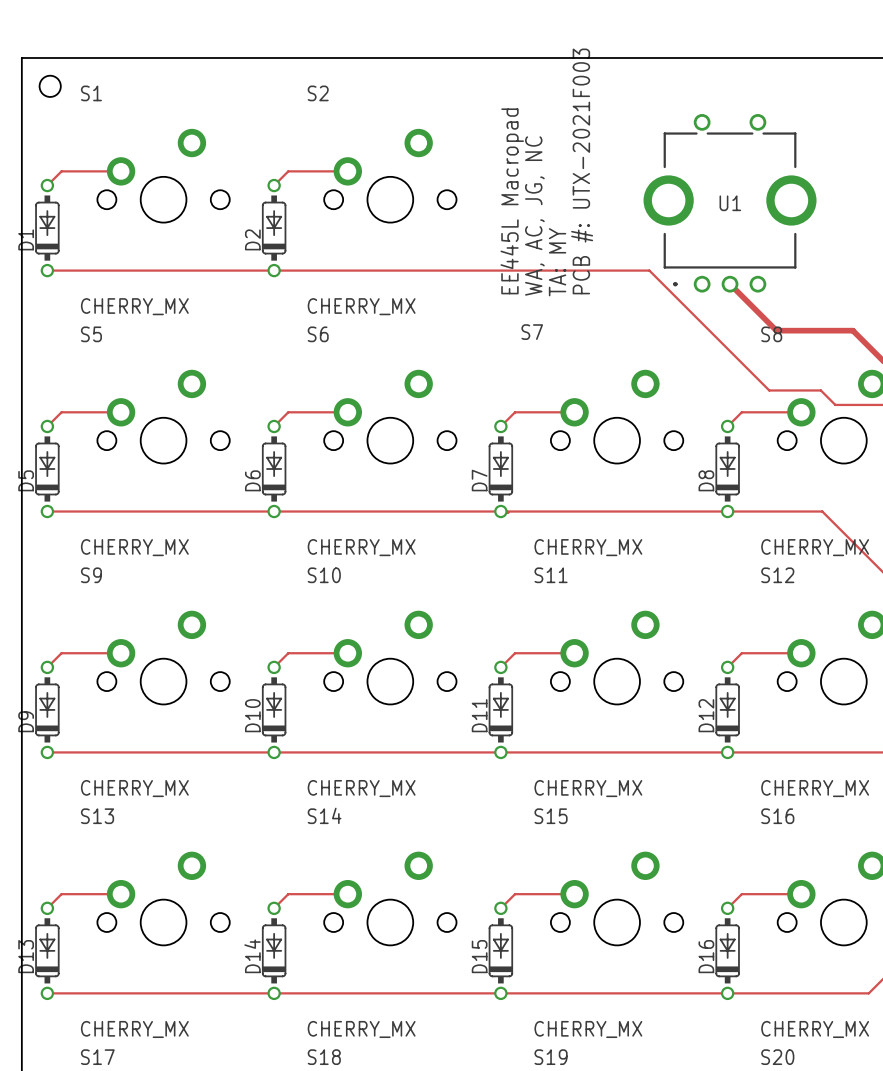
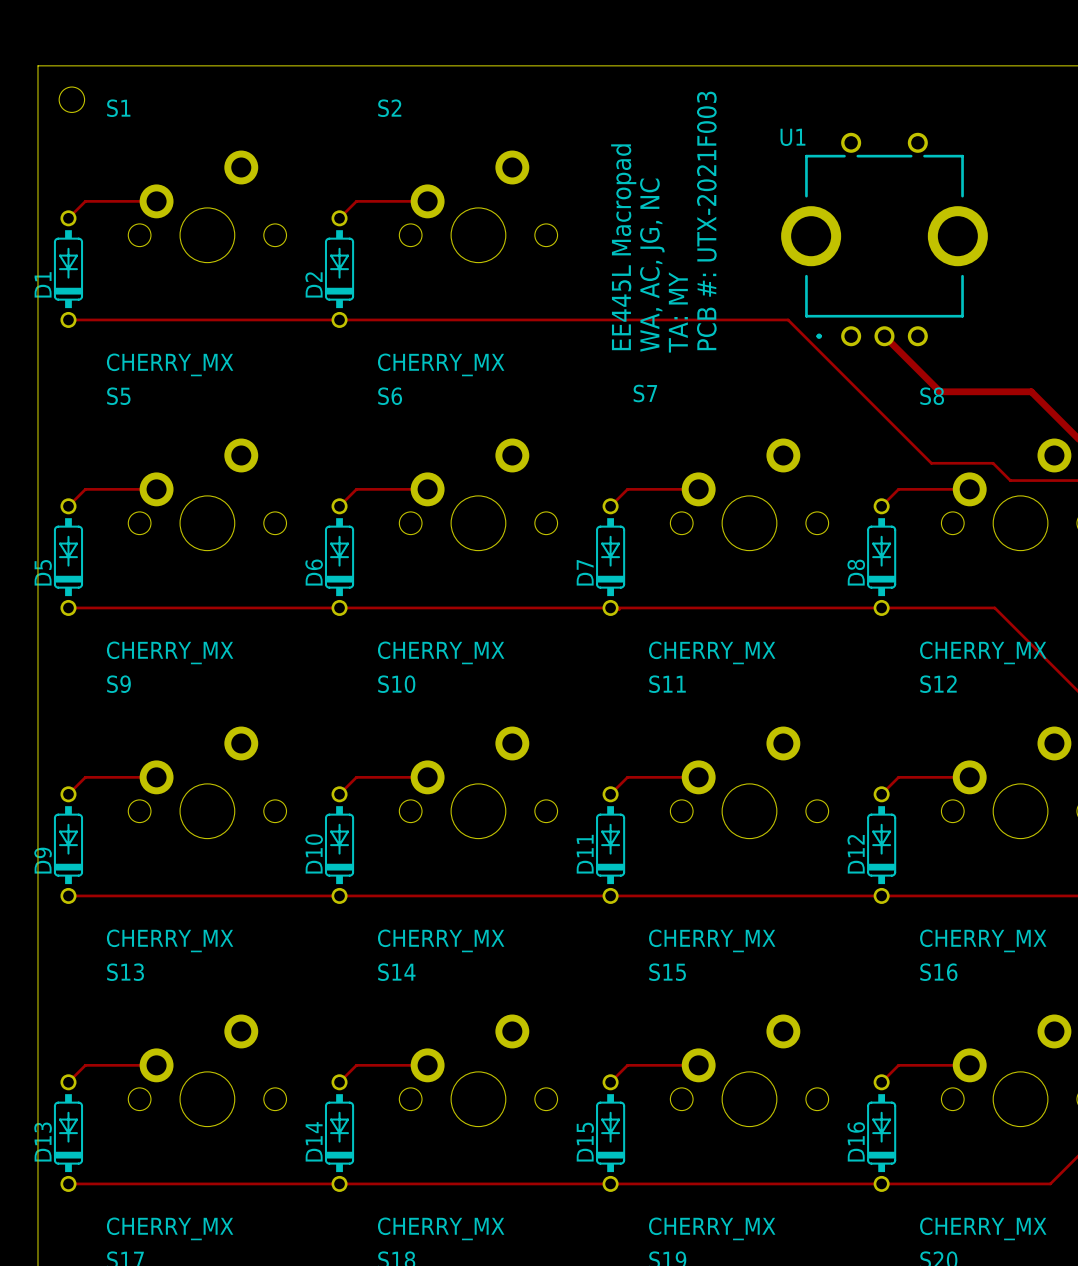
U1 name position: U1 (730, 203) -> U1 (792, 137)

